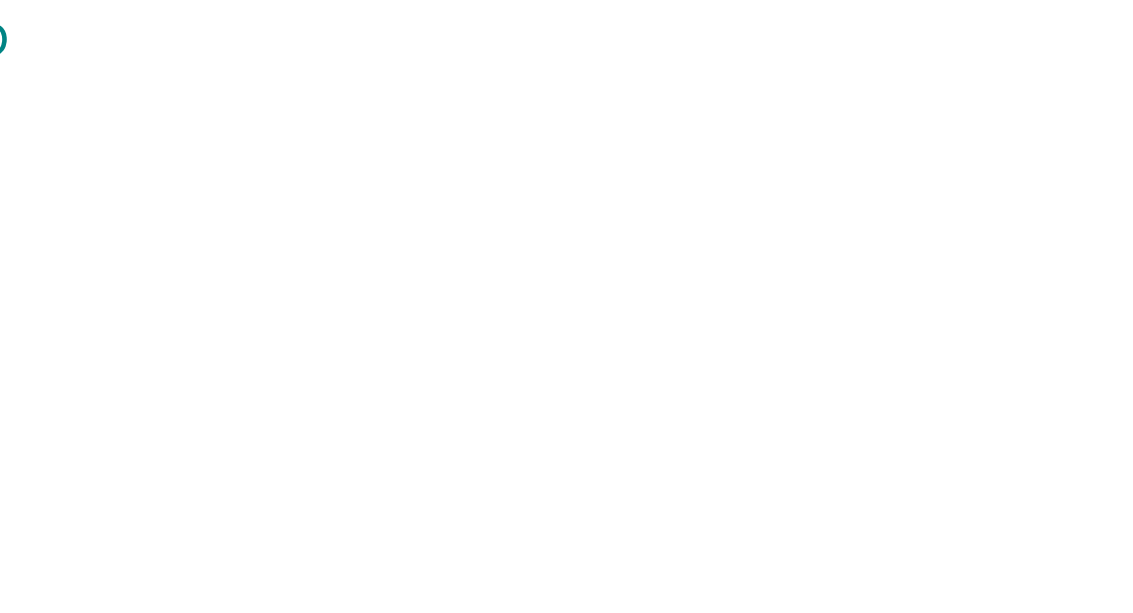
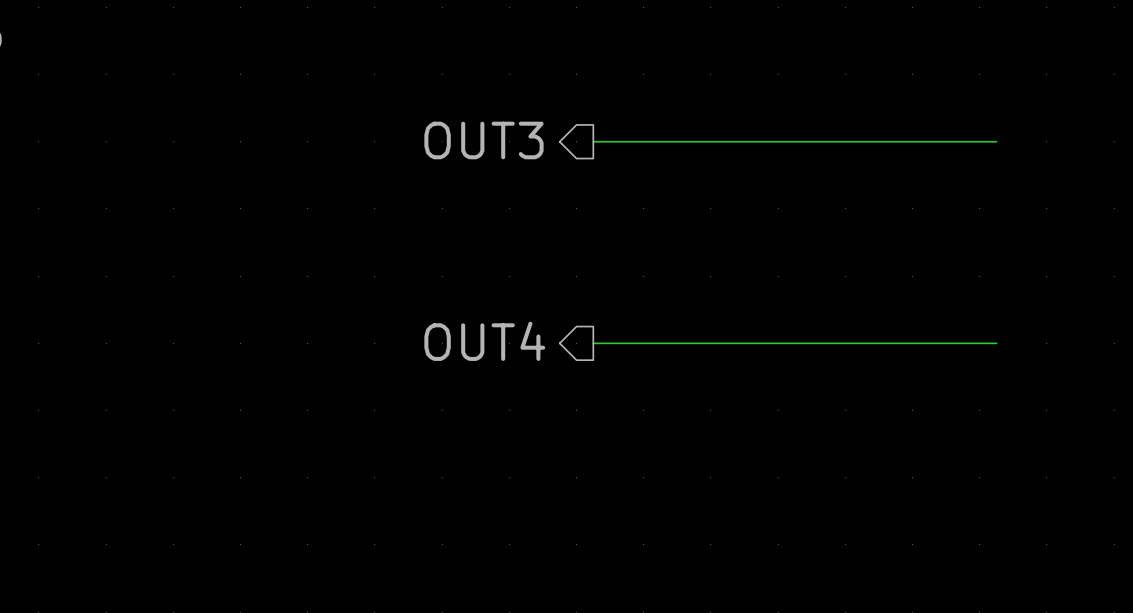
hierarchical label: none -> OUT3 (483, 140)
wire: none -> (593, 141) (996, 141)
hierarchical label: none -> OUT4 (484, 341)
wire: none -> (593, 343) (996, 343)

